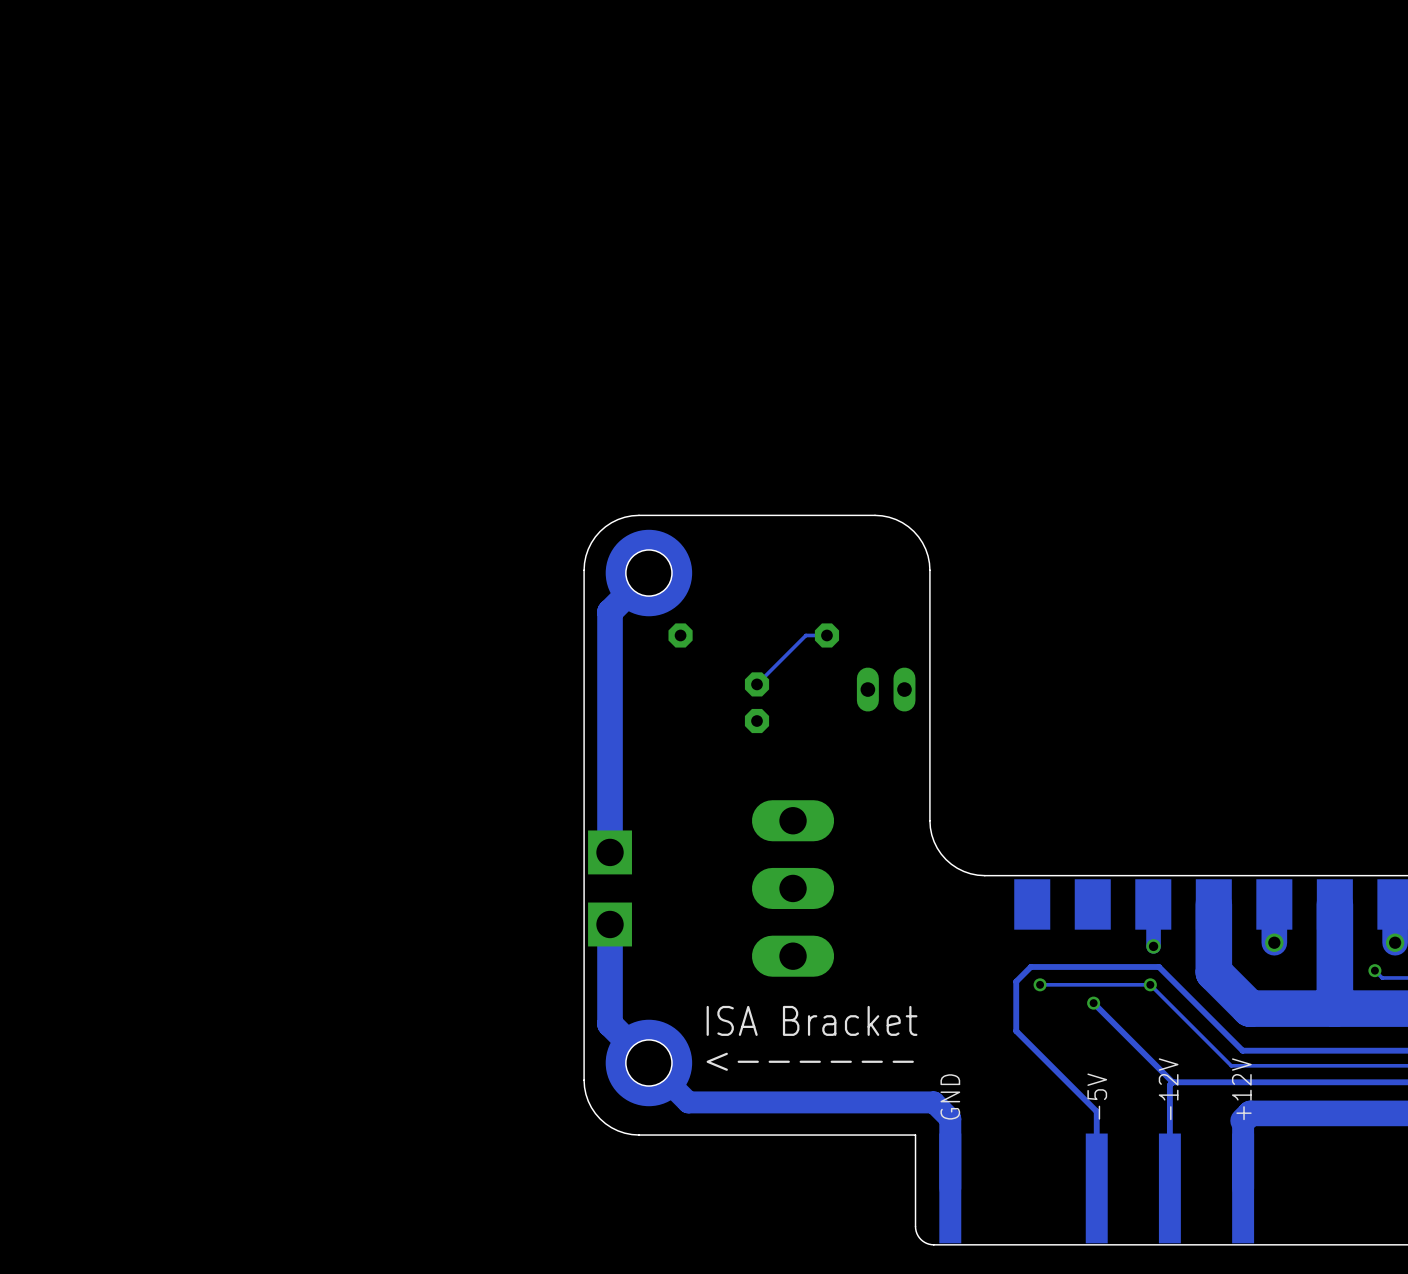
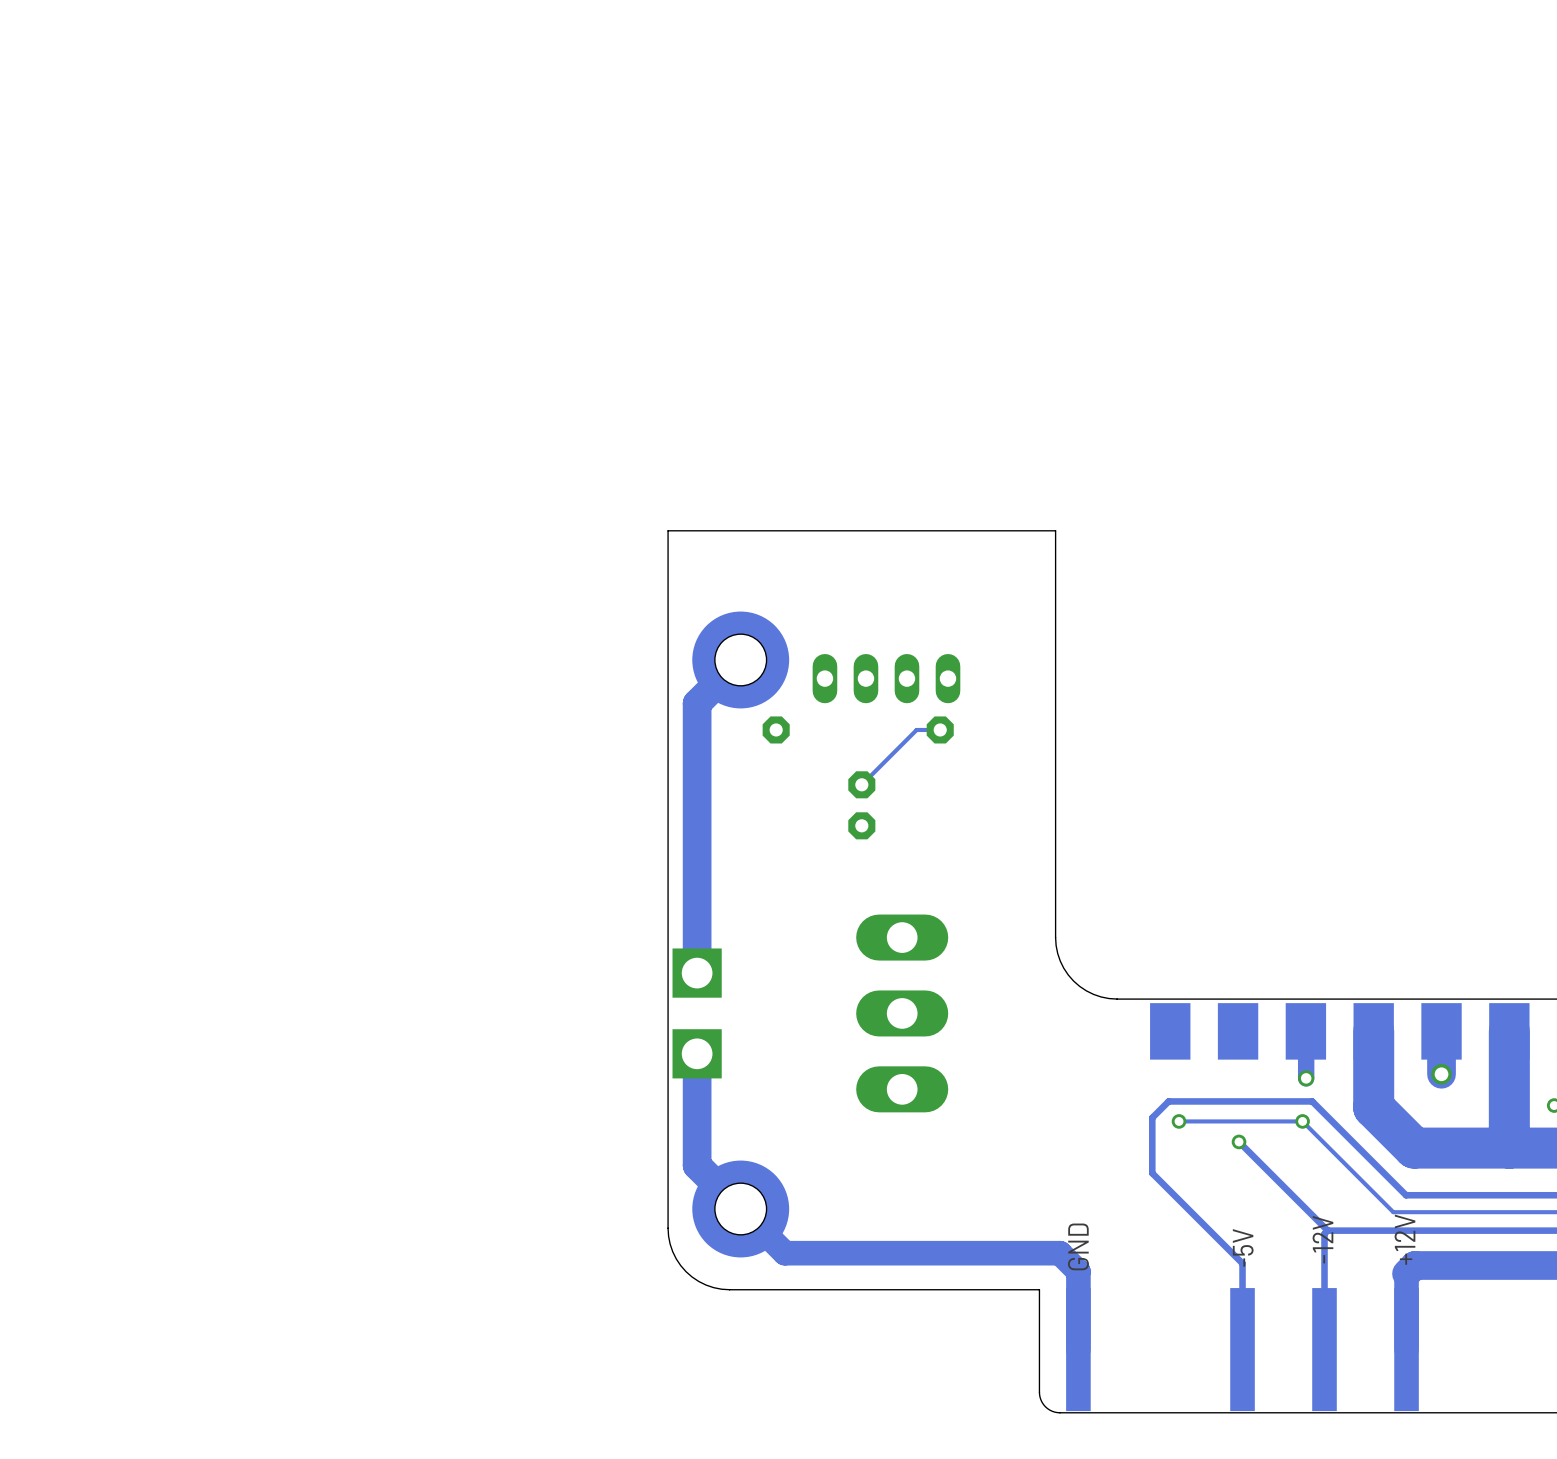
board edge: (929, 570) (925, 549) (913, 531) (896, 519) (875, 515) (631, 515) (611, 522) (600, 531) (588, 549) (584, 570) -> (1055, 656) (1055, 530) (668, 530) (668, 656)
part: none -> (886, 678)
part: (886, 689) -> none
text: ISA Bracket (812, 1020) -> none
text: <------ (810, 1061) -> none

